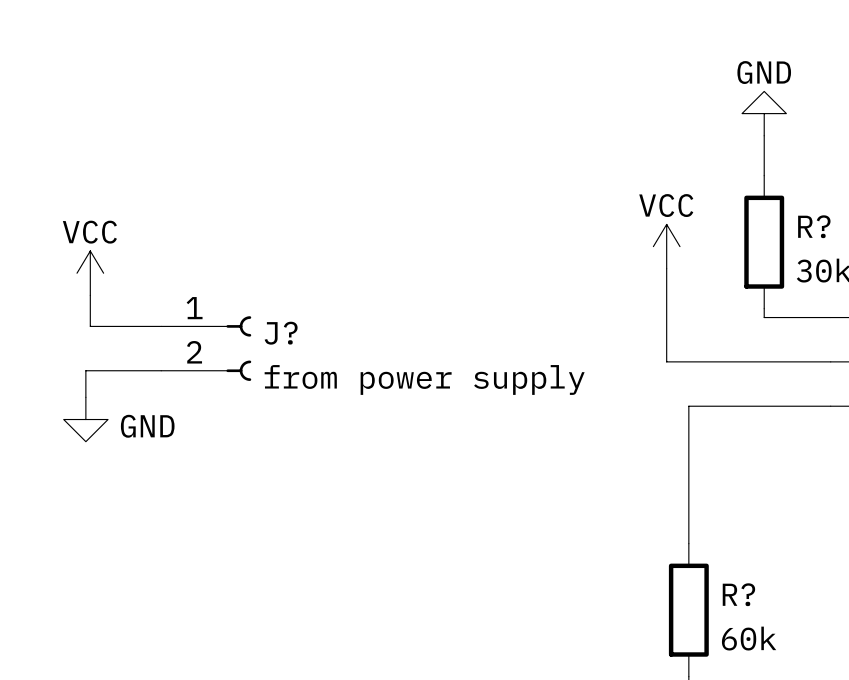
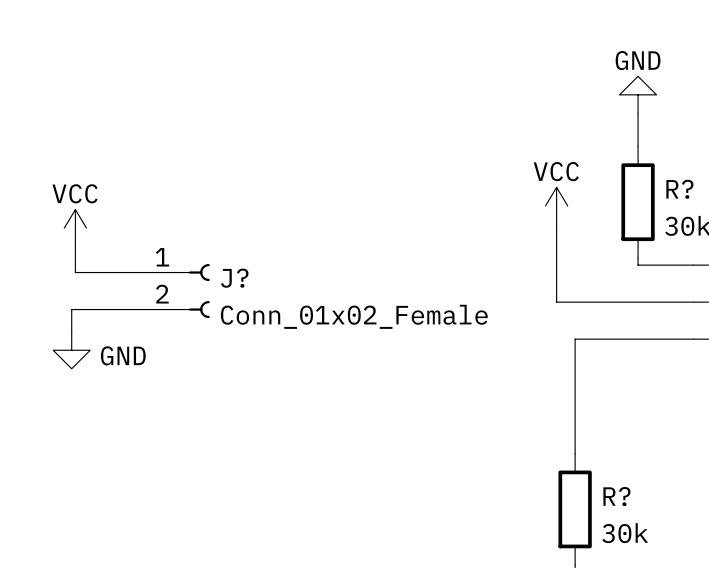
J? value: from power supply (424, 379) -> Conn_01x02_Female (354, 316)
R? value: 60k (749, 638) -> 30k (625, 533)

